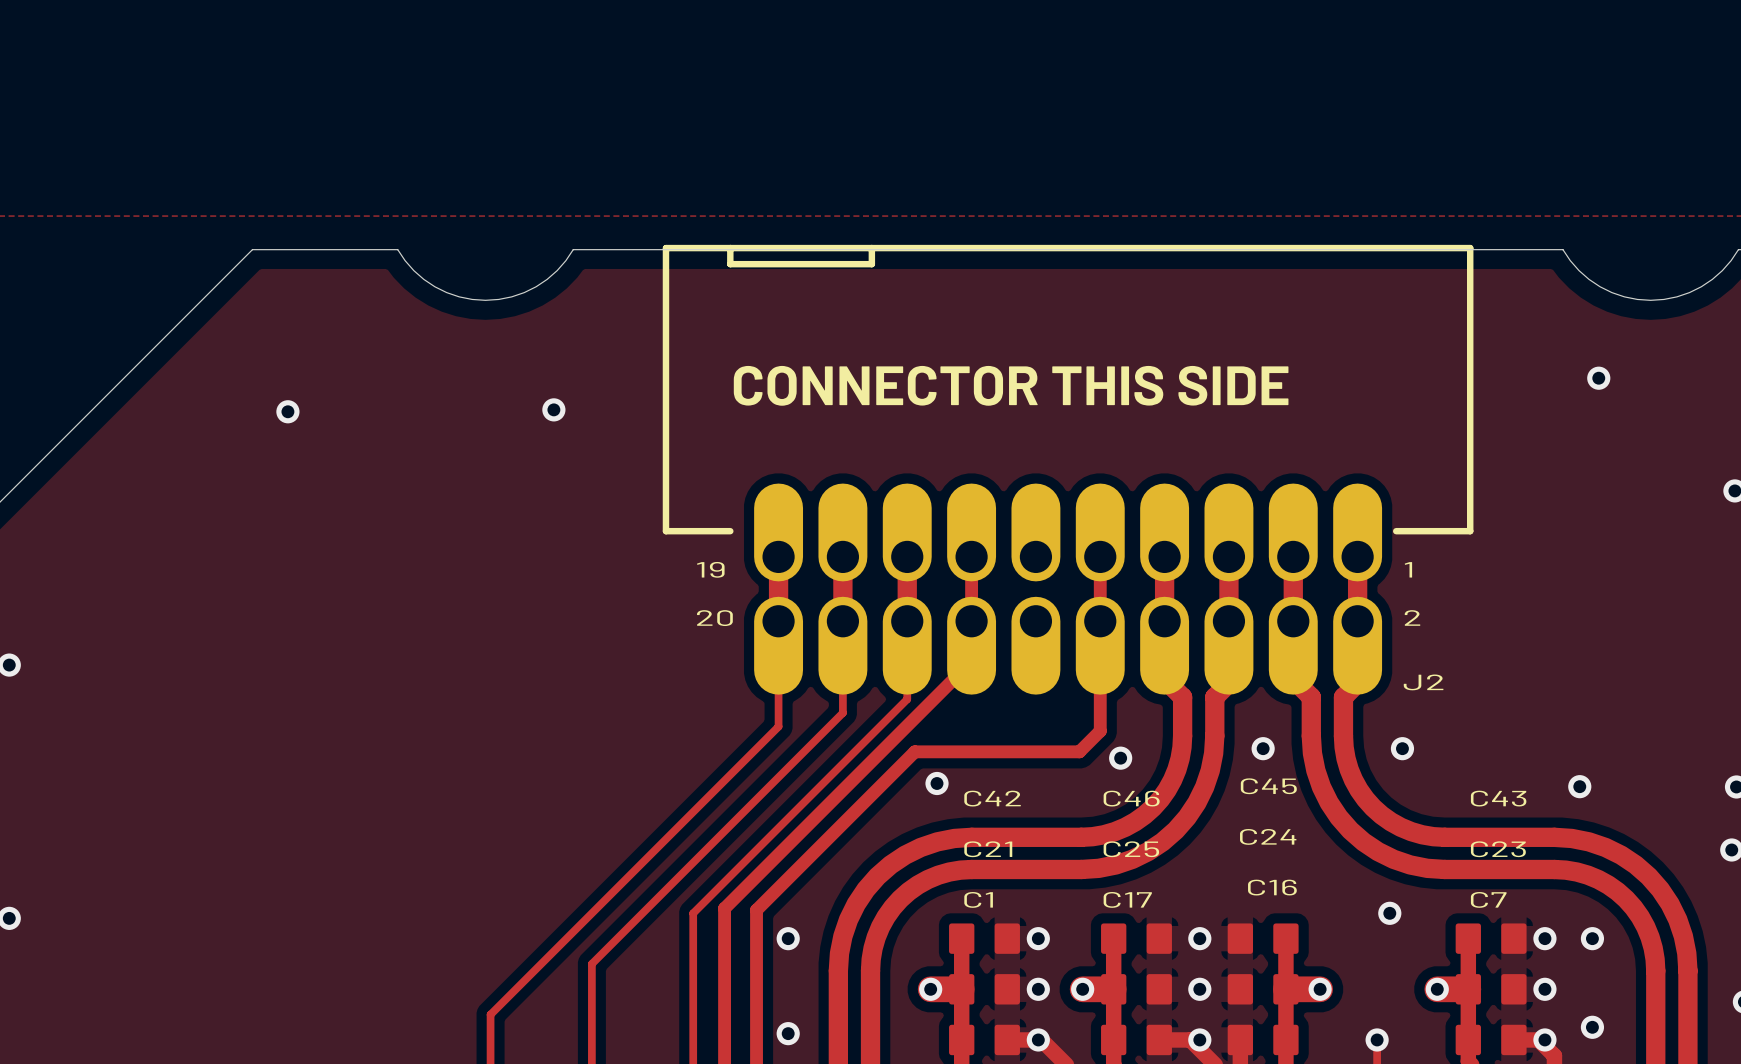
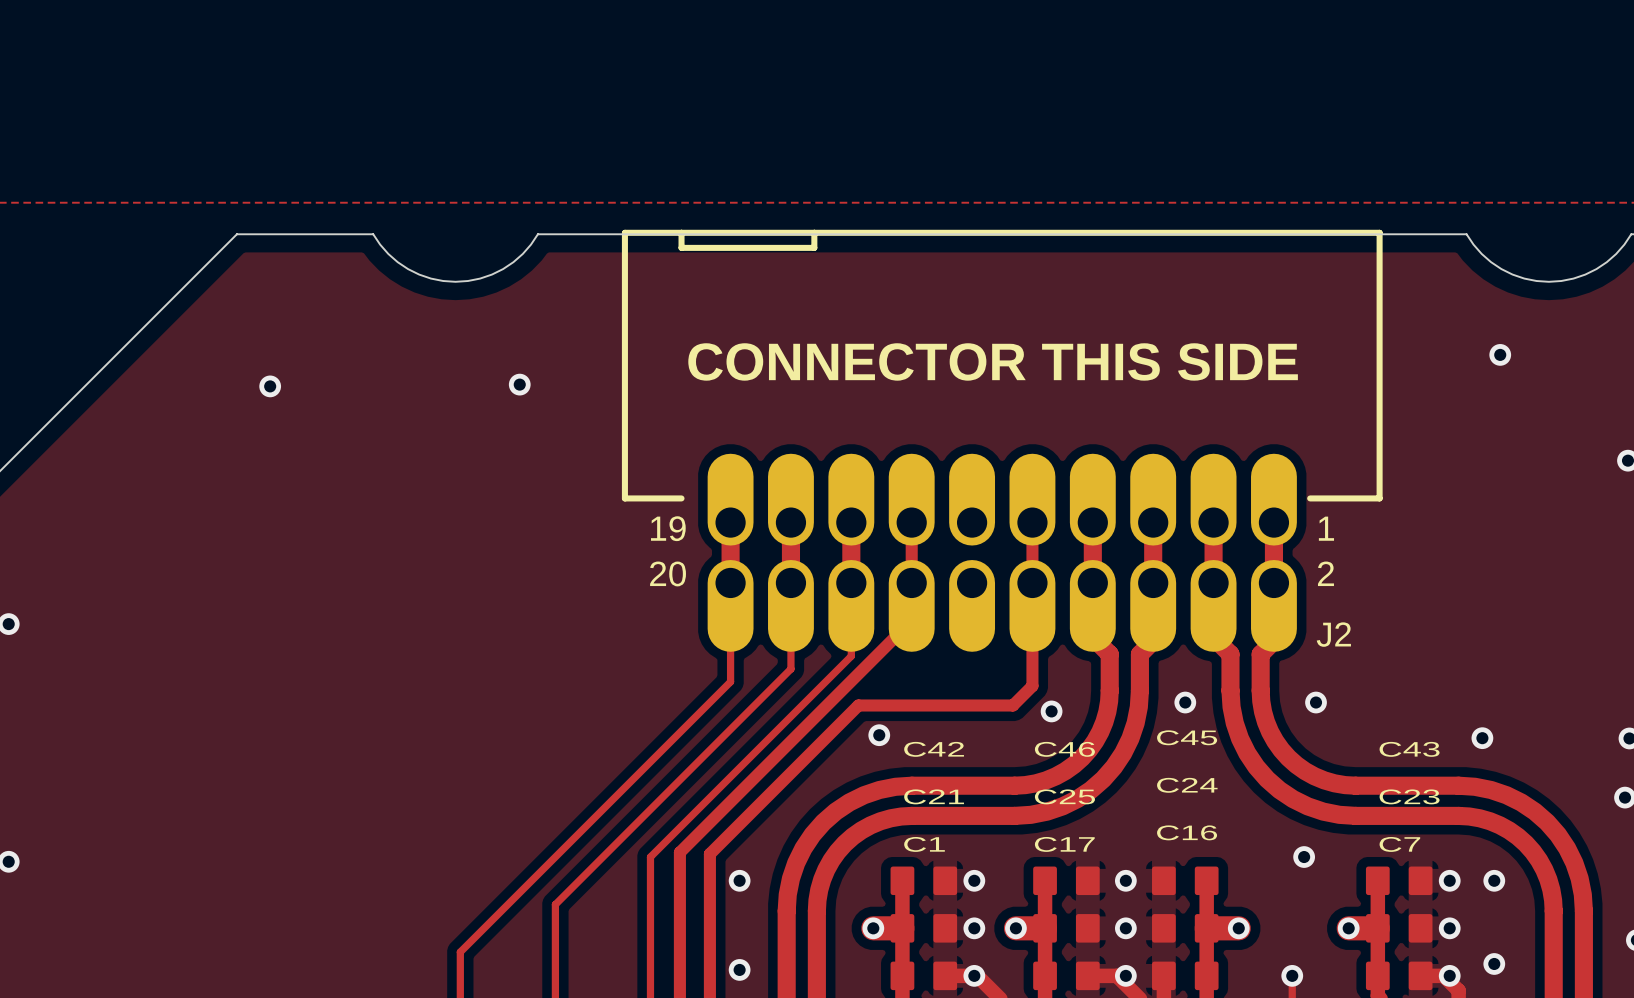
J2 footprint: [662, 244, 1474, 695] -> [621, 229, 1383, 652]

